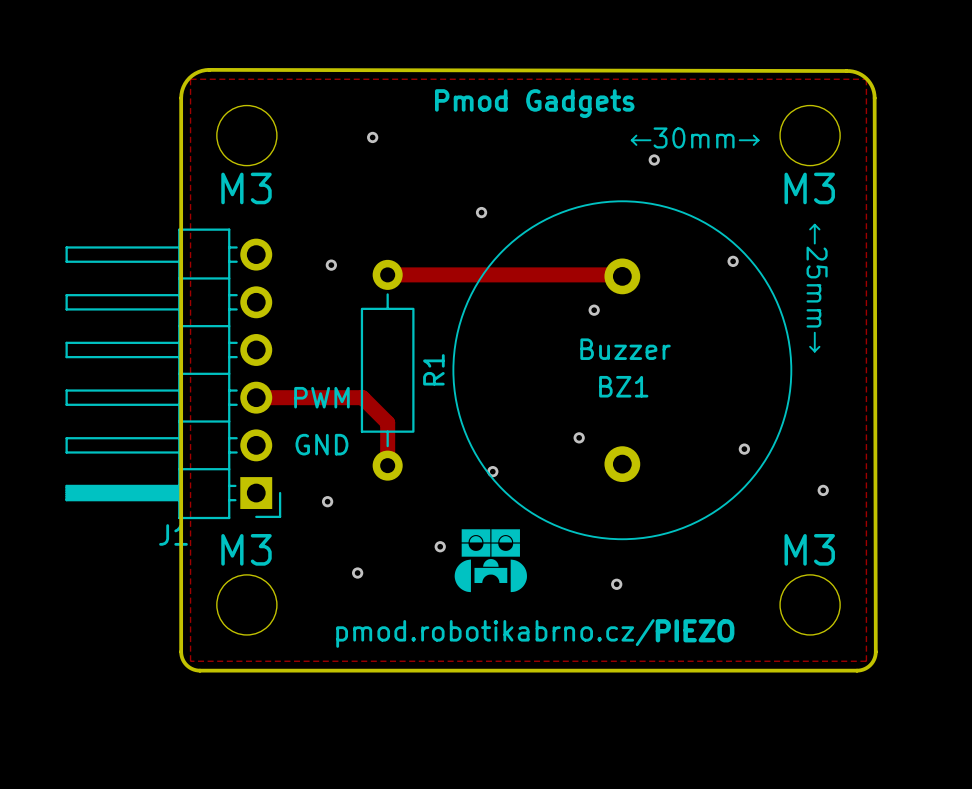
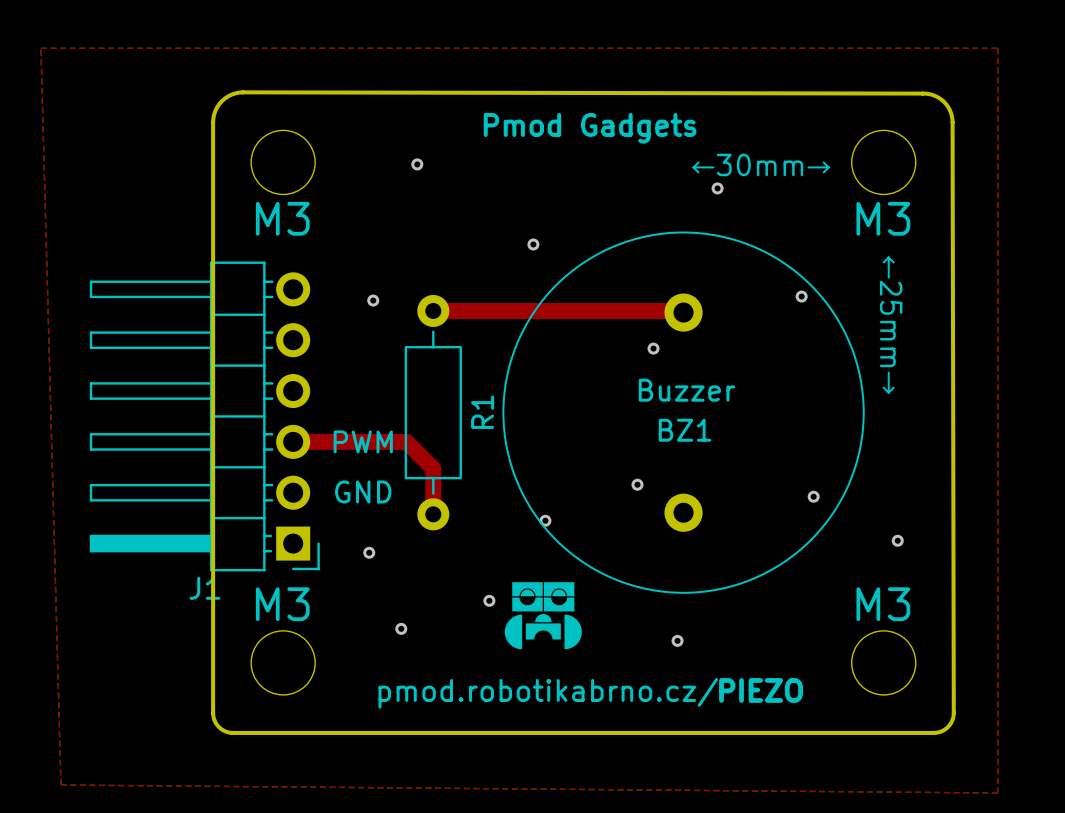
top zone outline: (190, 79) (866, 79) (866, 661) (190, 661) (190, 79) -> (40, 48) (60, 785) (997, 793) (997, 48) (40, 48)

